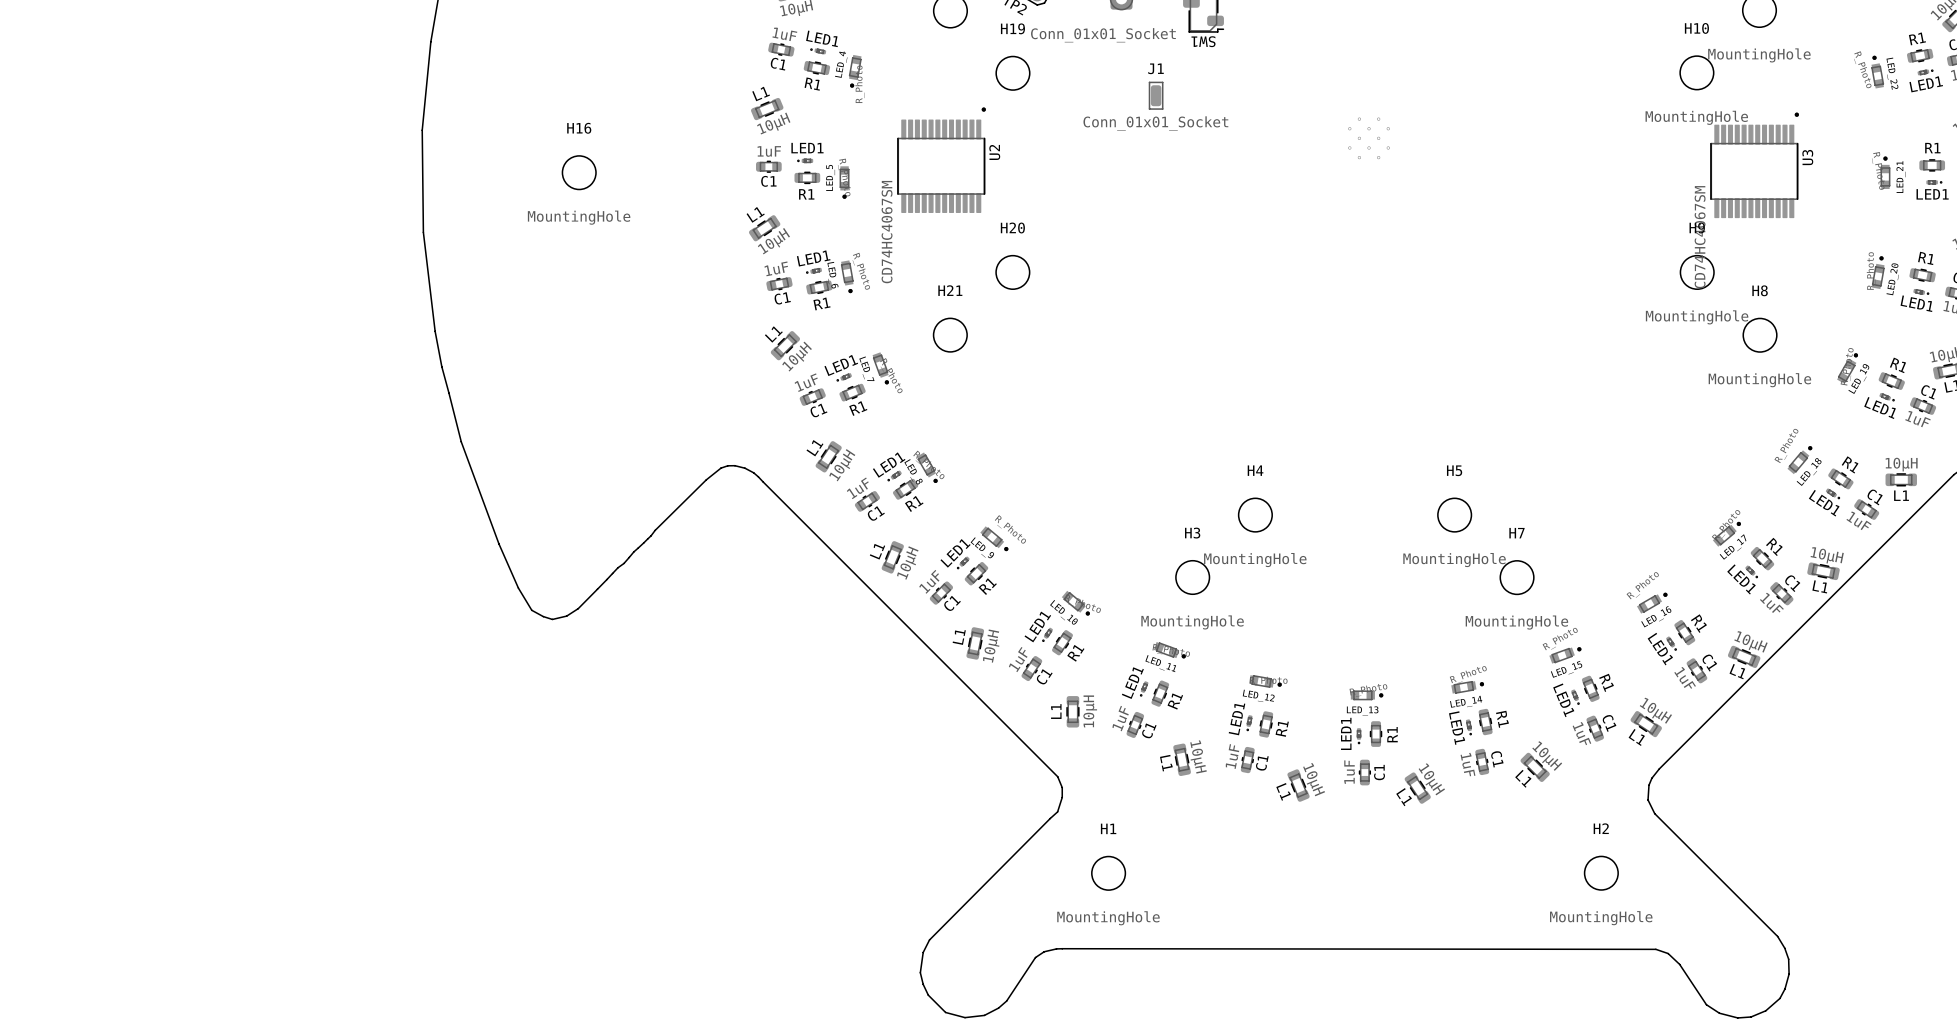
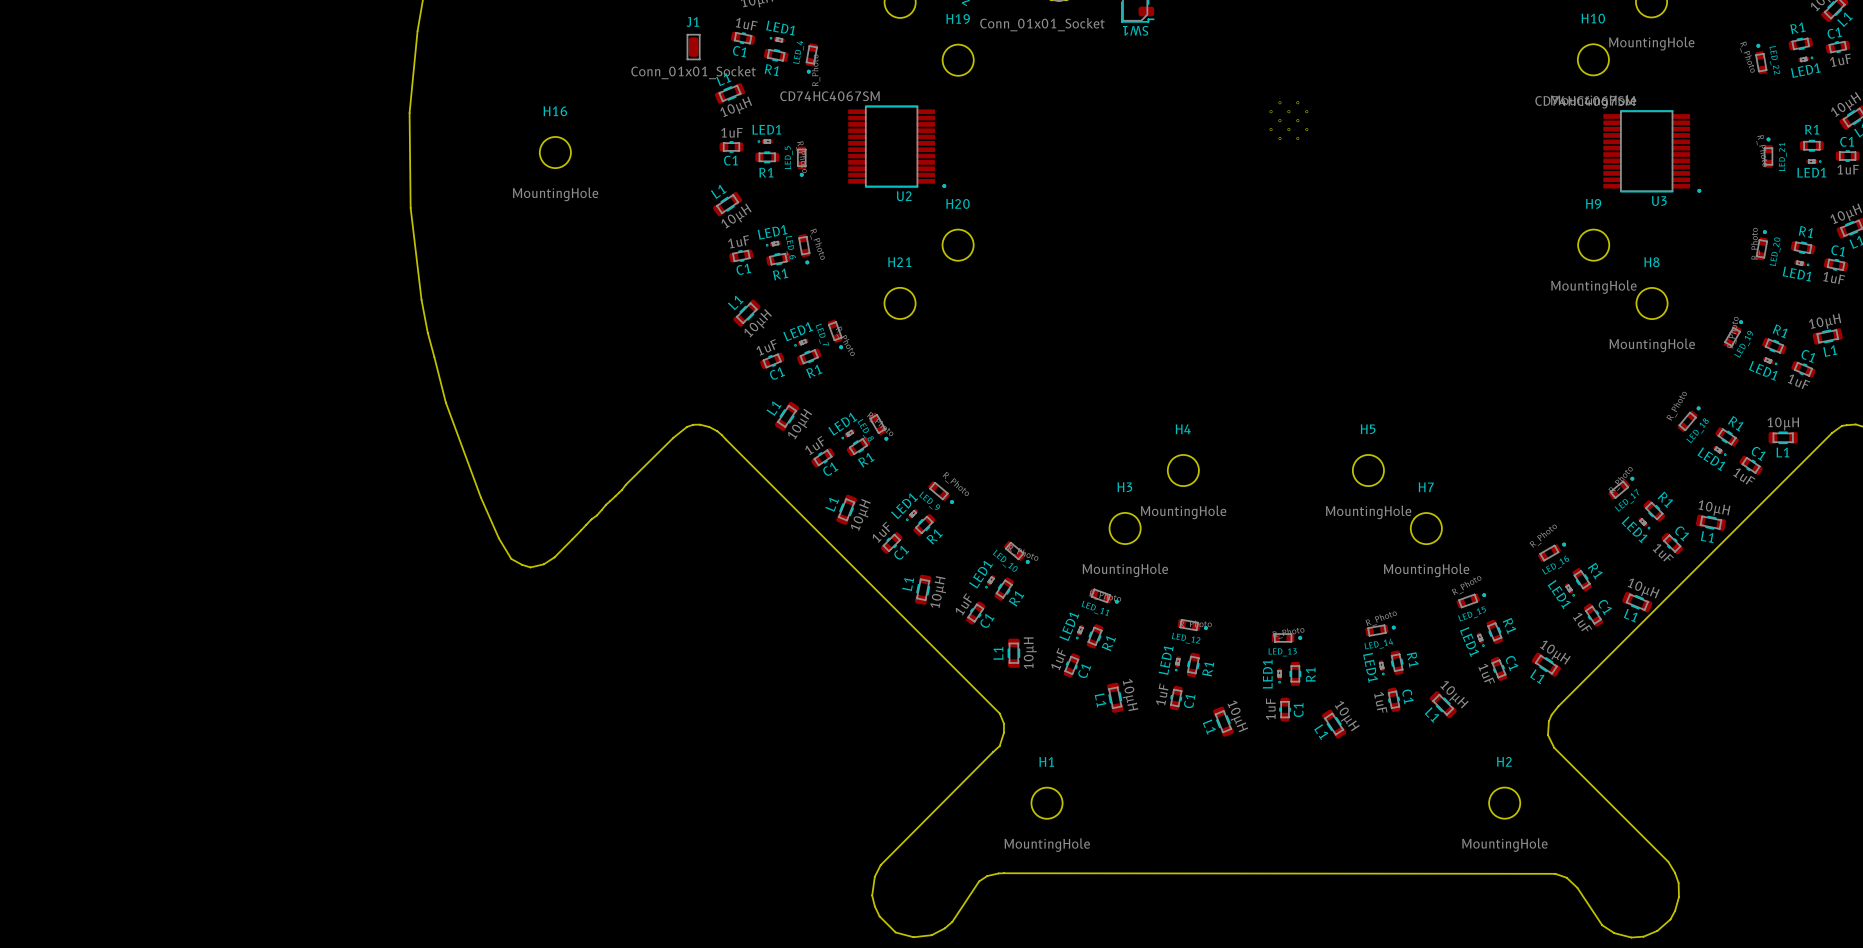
J1 position: (1156, 95) -> (693, 47)
U2 rotation: 0° (941, 160) -> 90° clockwise (897, 146)
U3 rotation: 0° (1754, 165) -> 90° clockwise (1652, 151)

